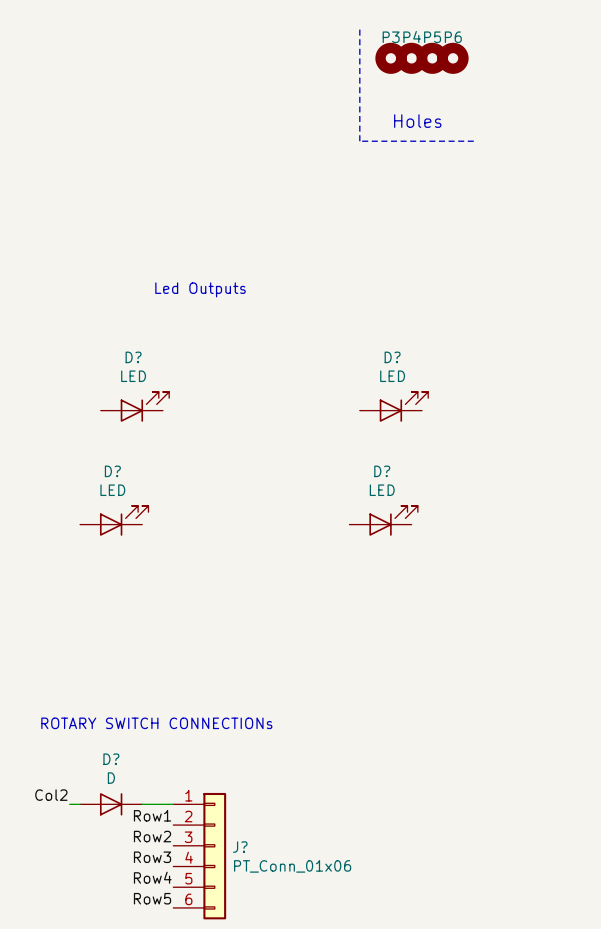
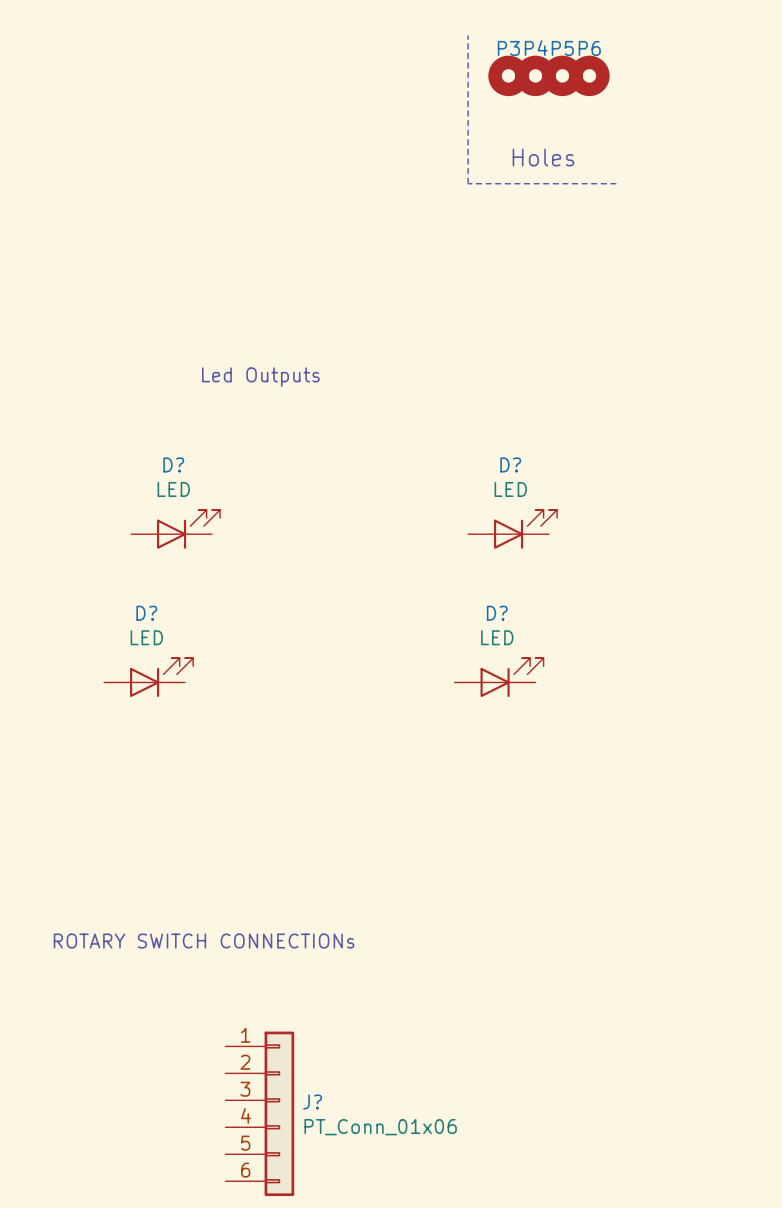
label: Col2 (51, 795) -> none
wire: (69, 804) (80, 804) -> none
D?: D (111, 804) -> none
wire: (142, 804) (173, 804) -> none
label: Row1 (152, 815) -> none
label: Row2 (152, 836) -> none
label: Row3 (152, 857) -> none
label: Row4 (152, 877) -> none
label: Row5 (152, 898) -> none

